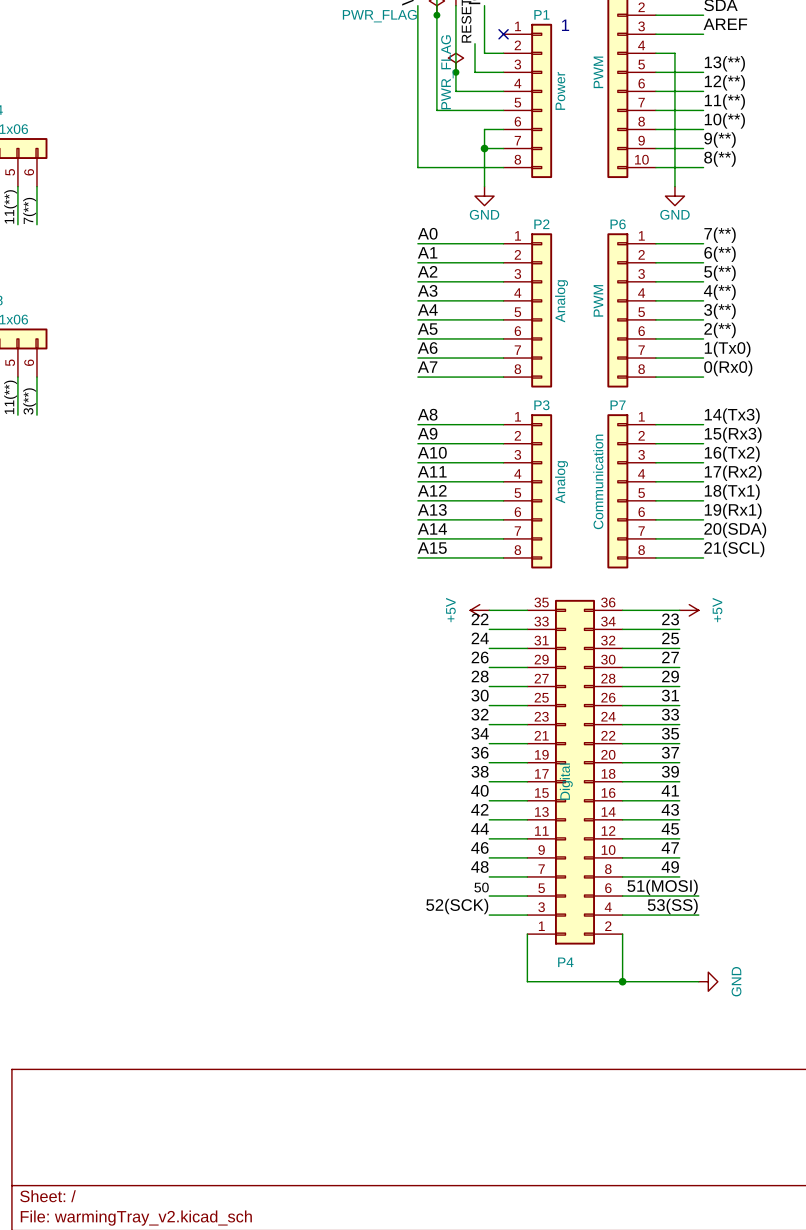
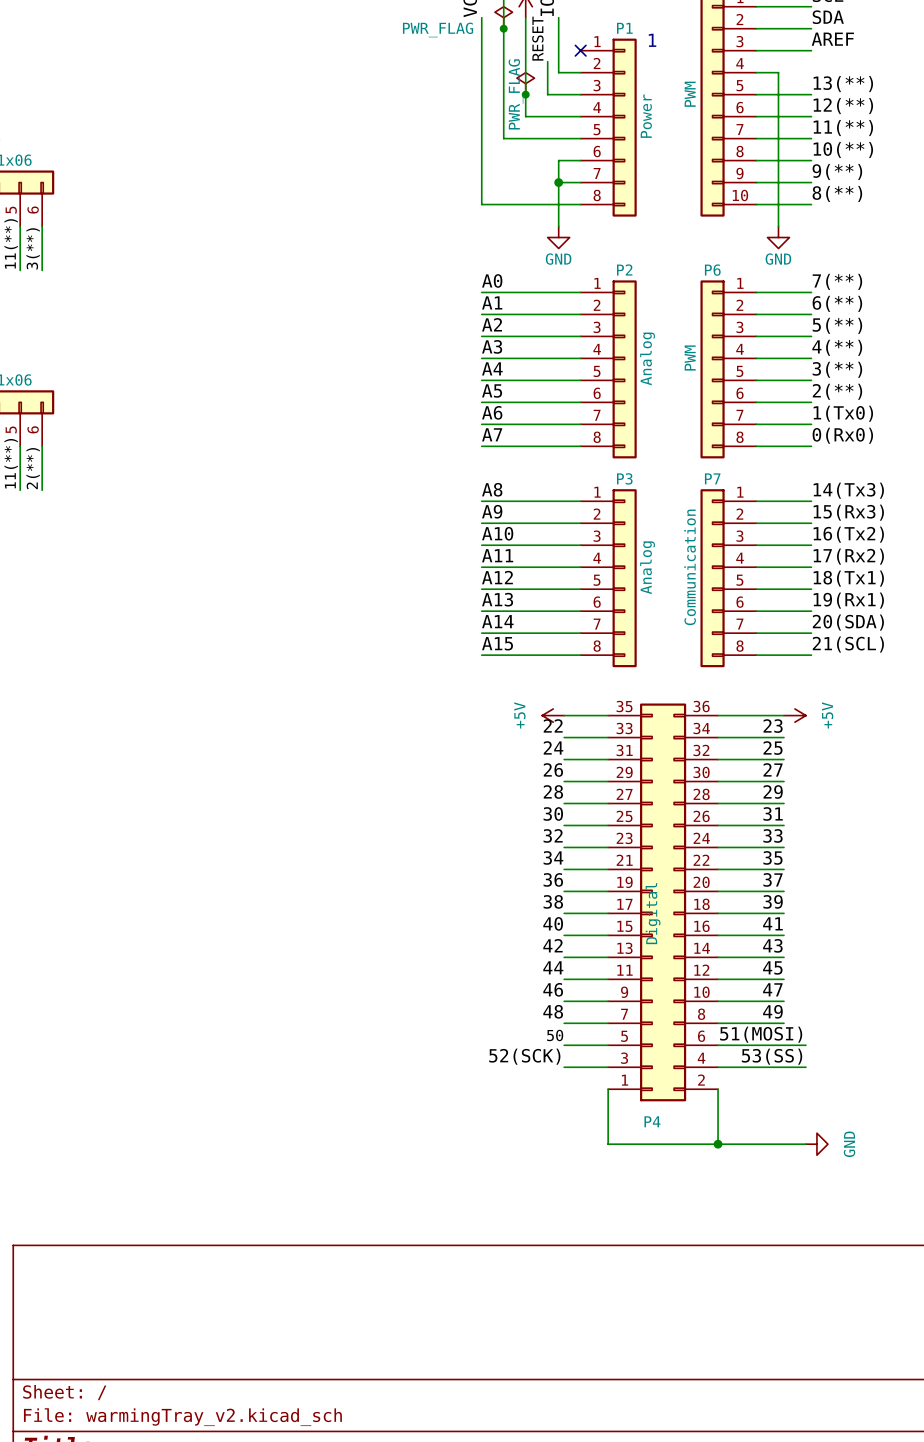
label: 7(**) (29, 210) -> 3(**) (33, 248)
label: 3(**) (29, 401) -> 2(**) (33, 468)

